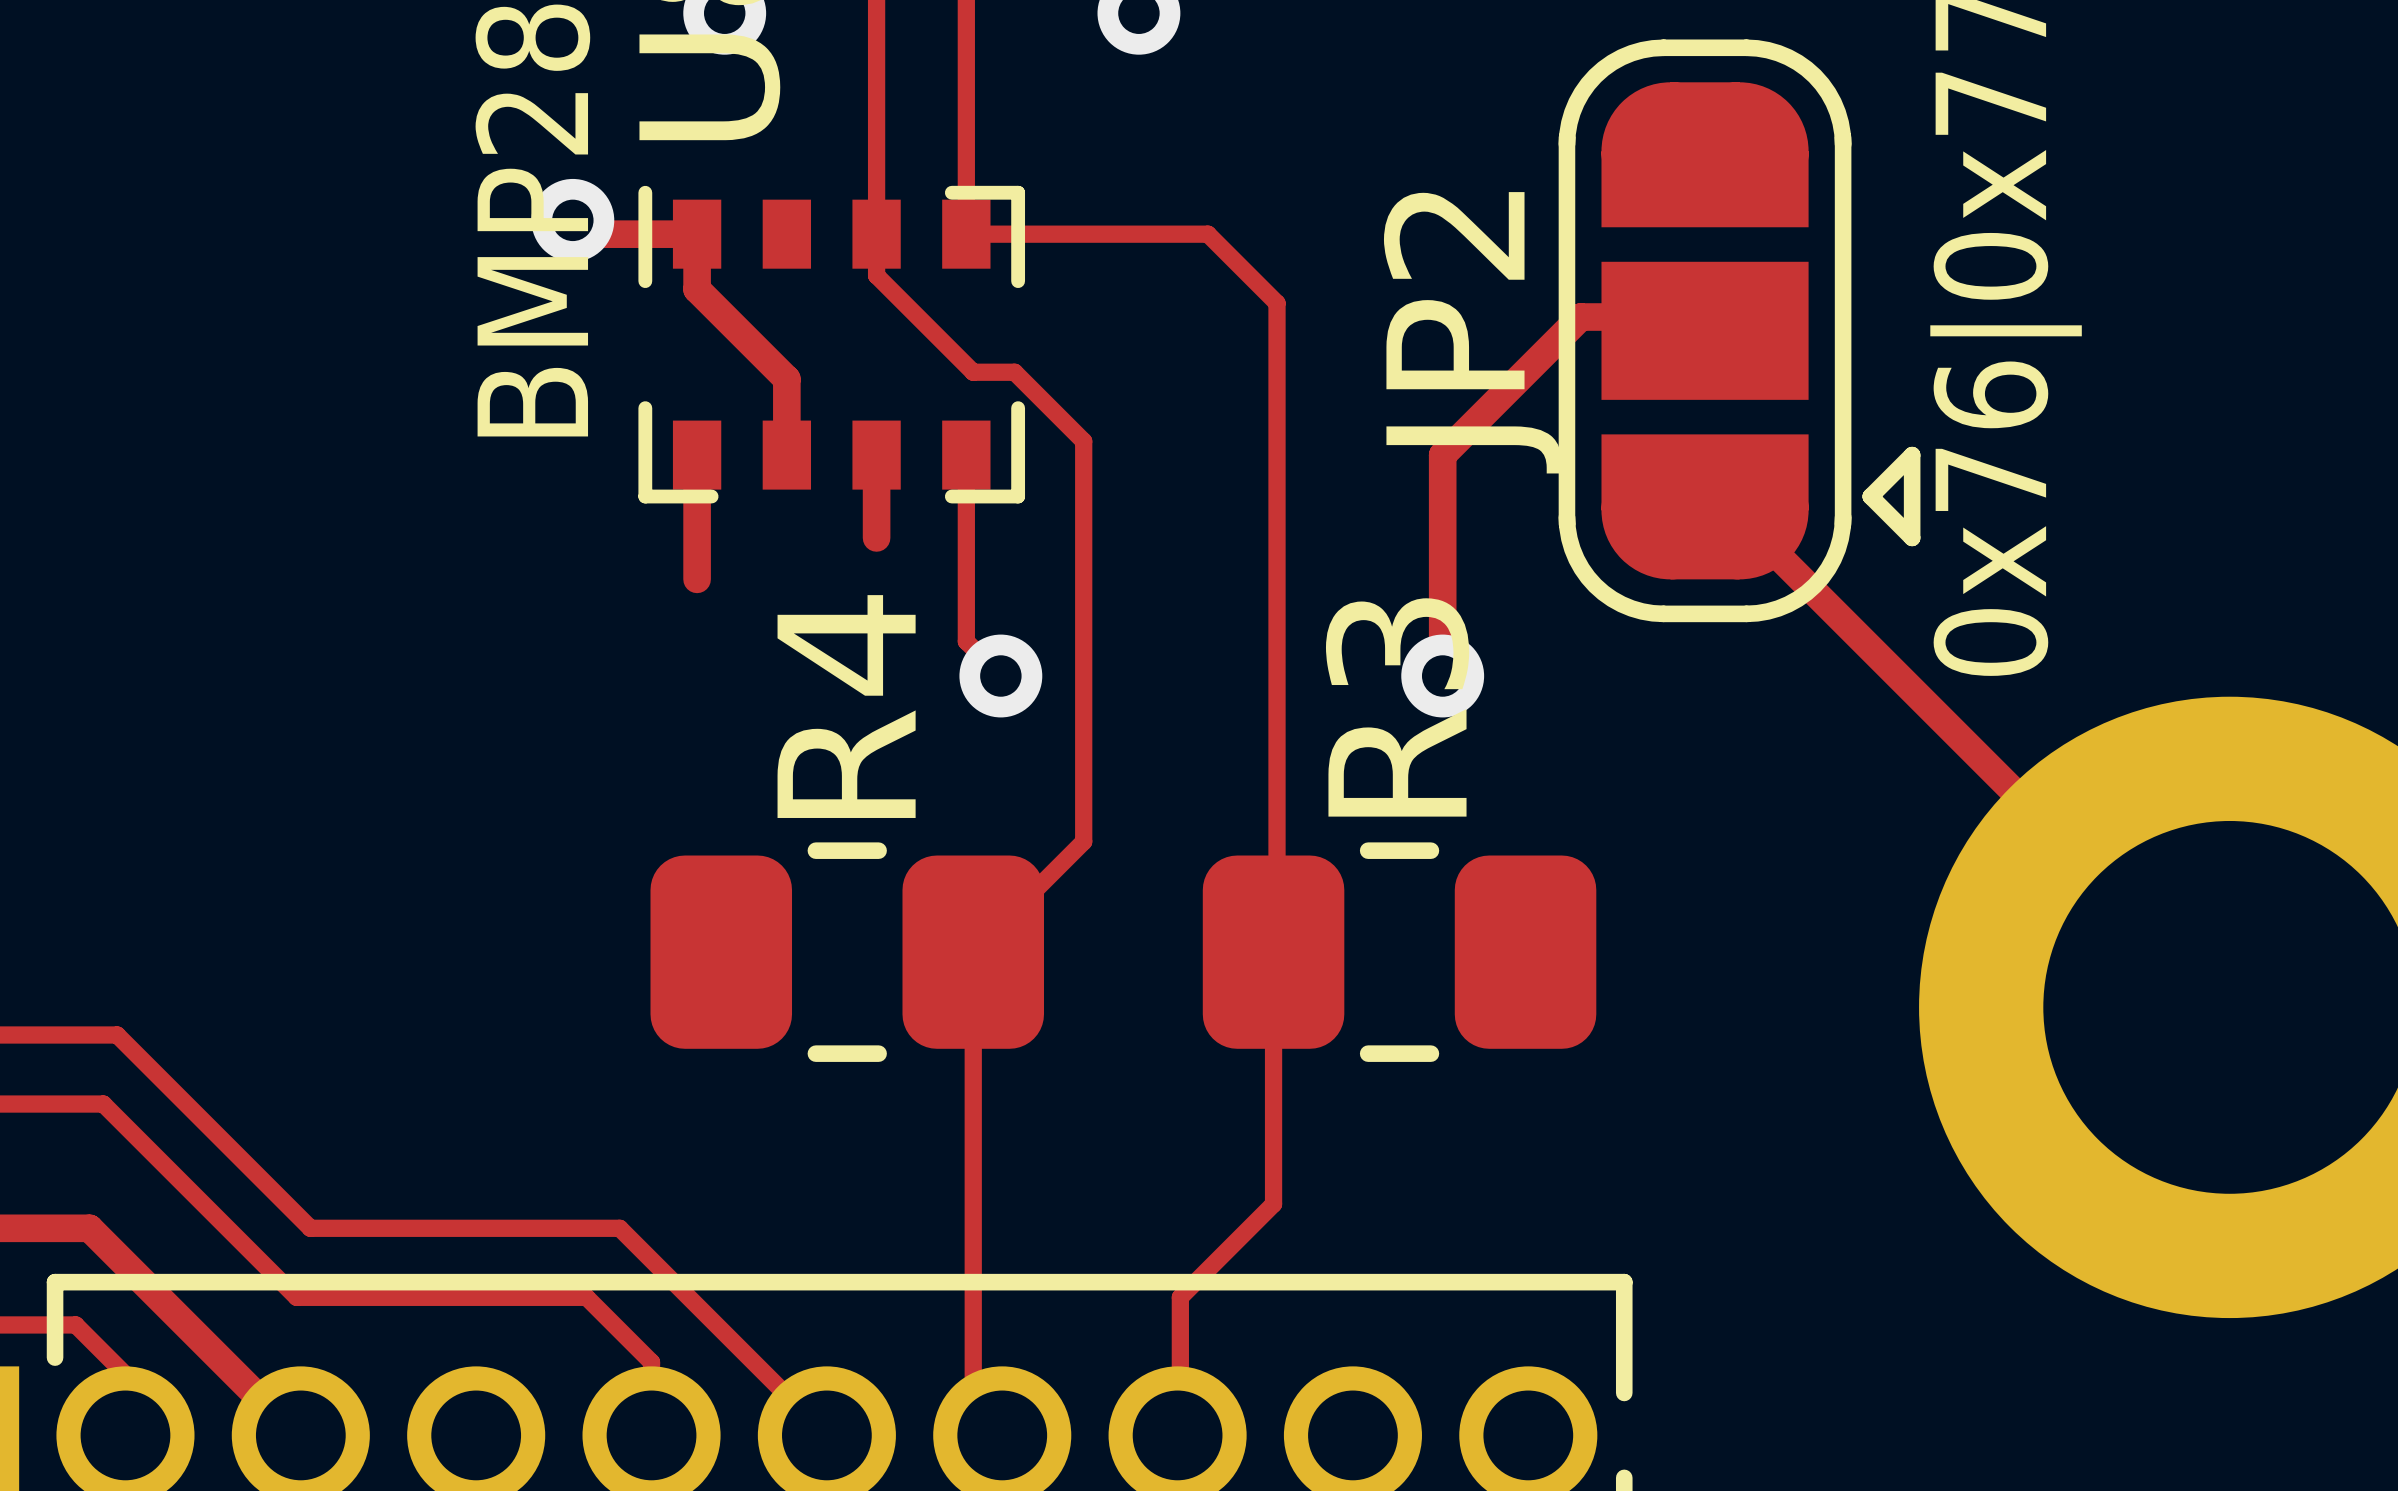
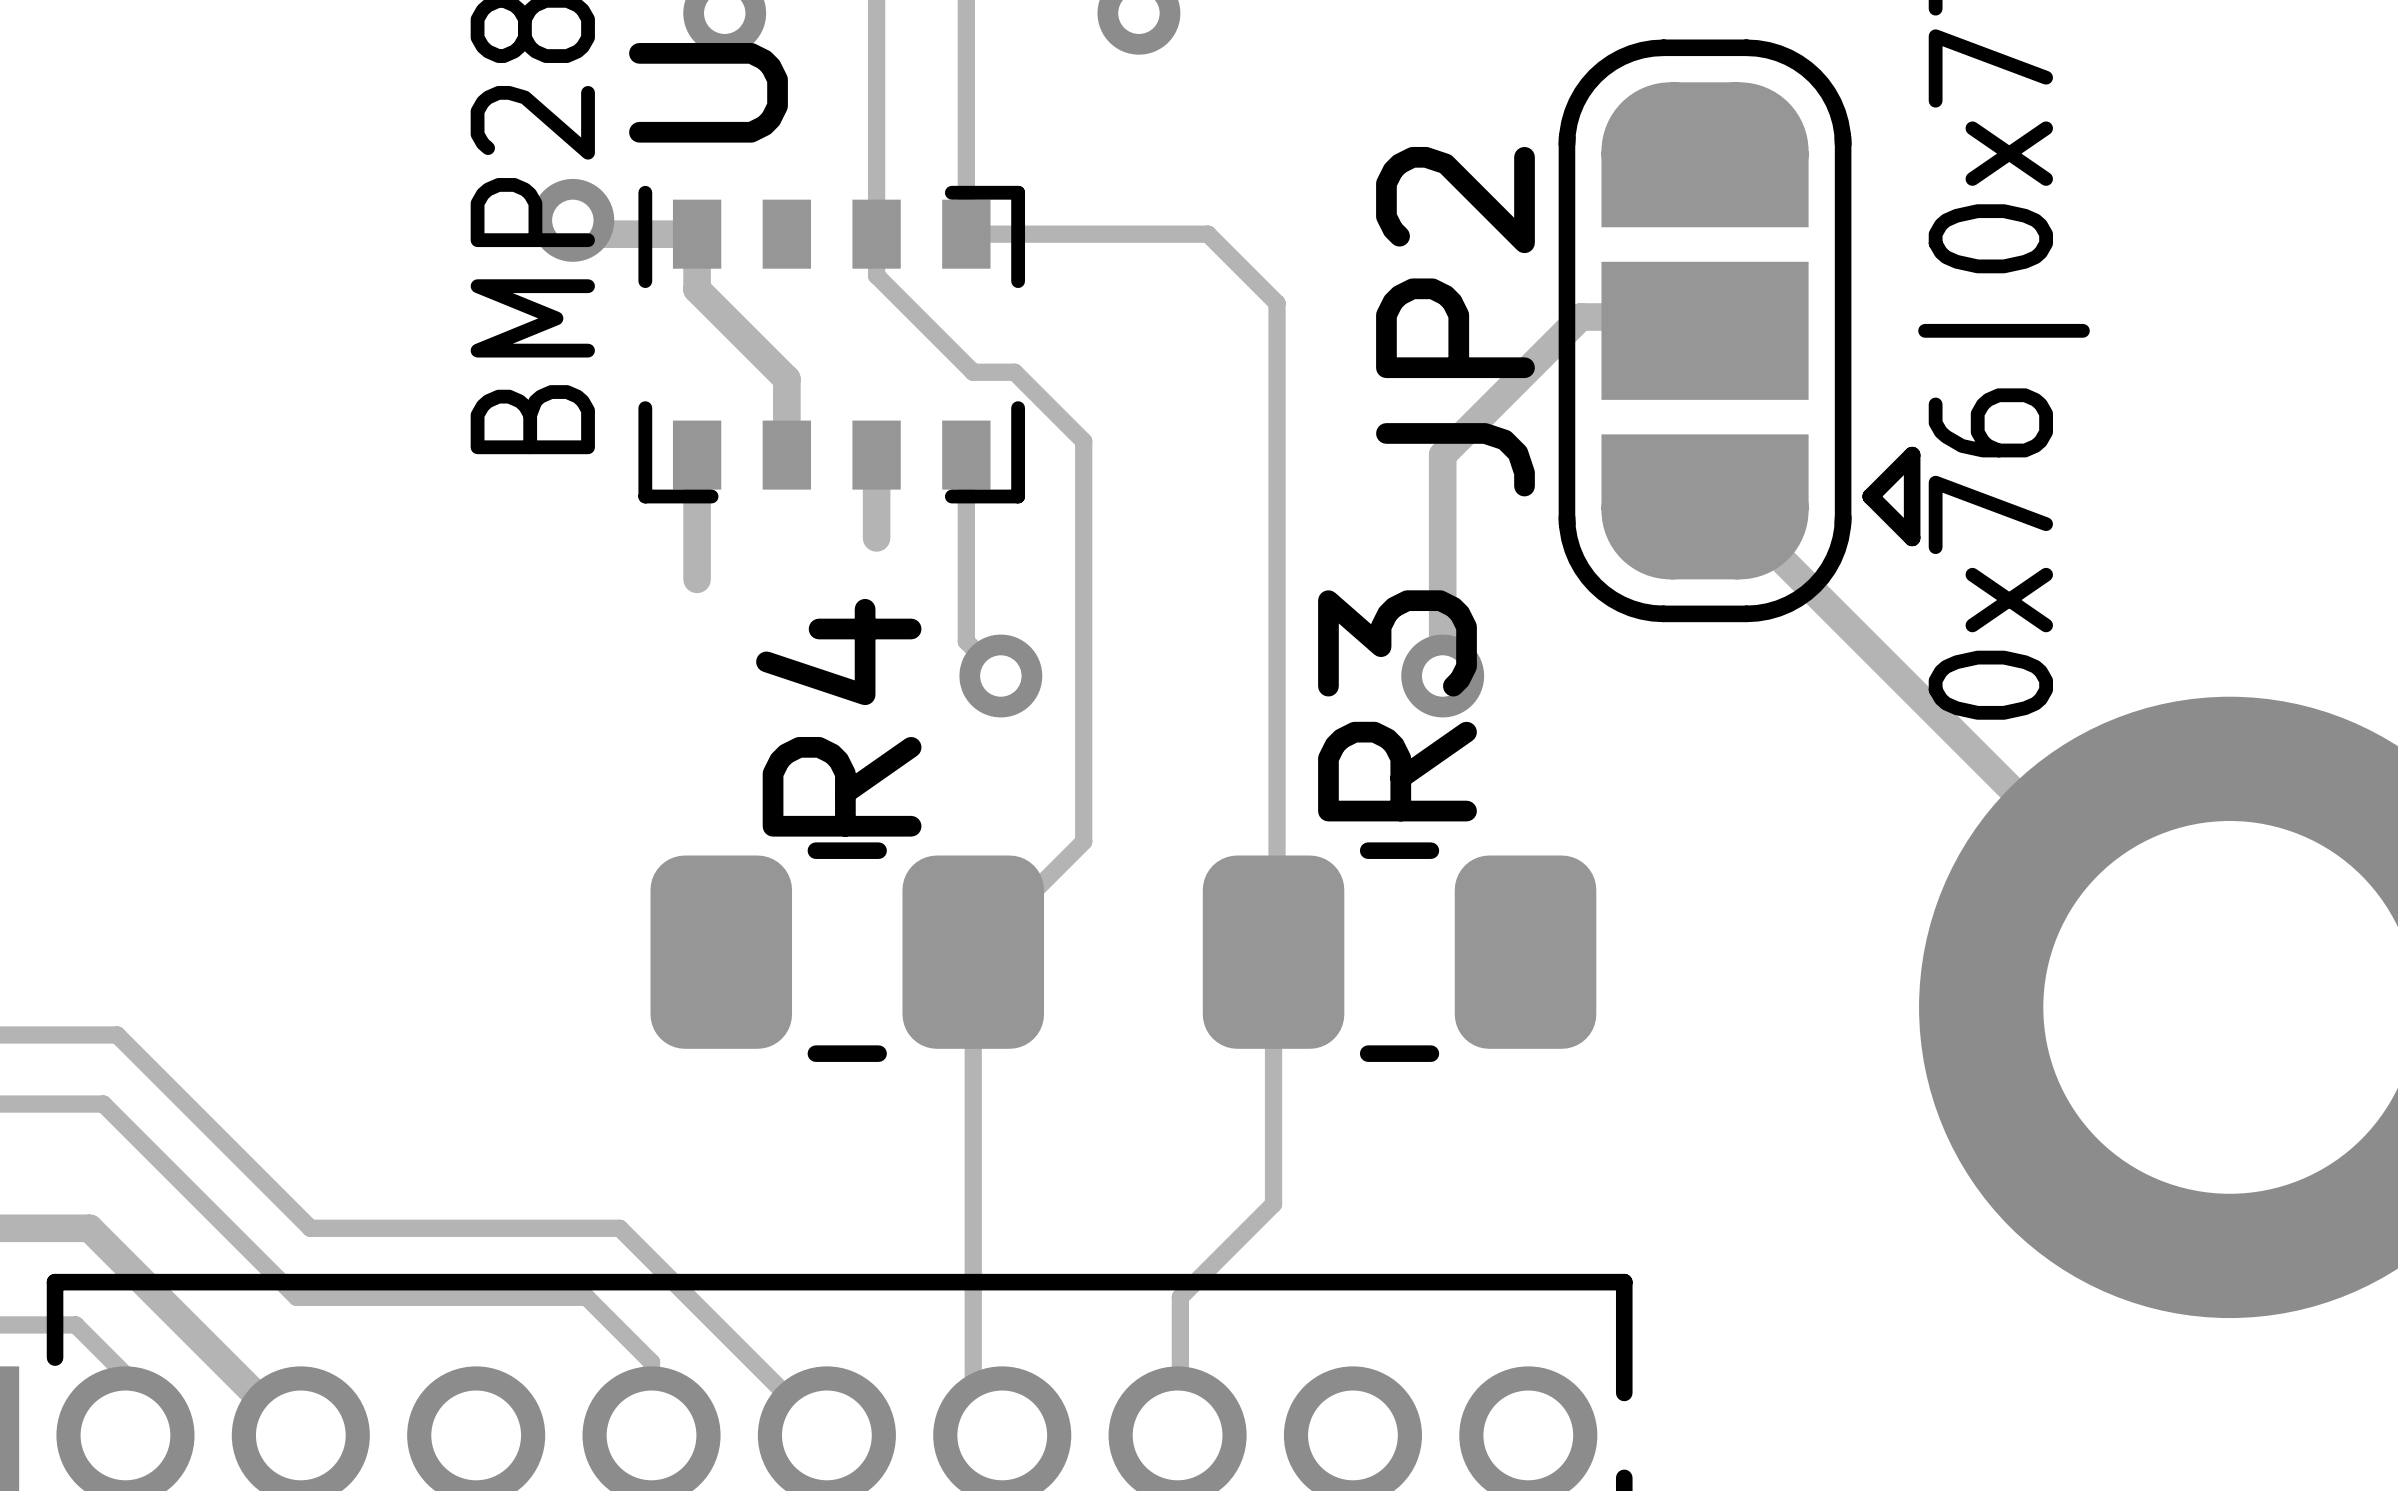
R4 name position: R4 (846, 706) -> R4 (838, 717)

